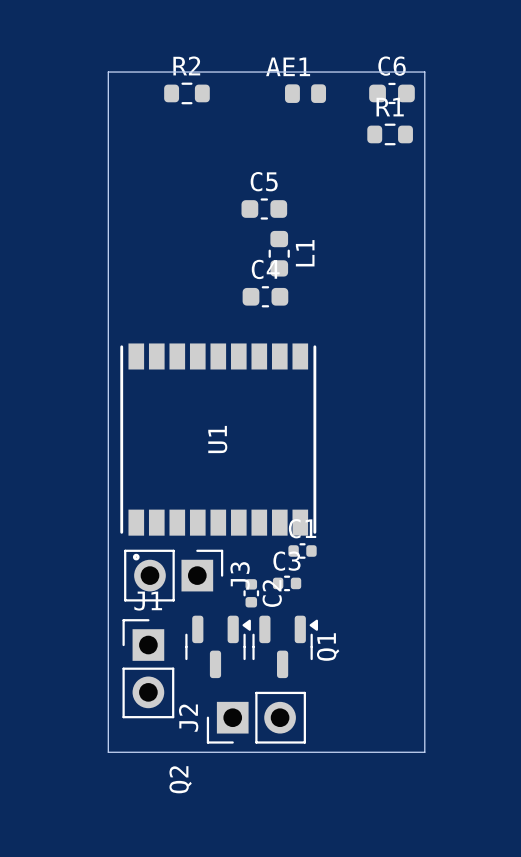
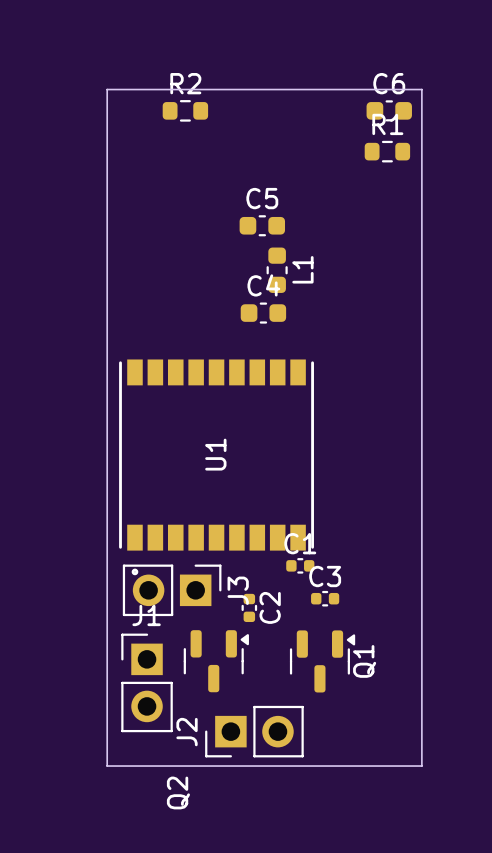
AE1: (305, 93) -> none
C3 position: (287, 583) -> (325, 598)
Q1 position: (285, 646) -> (322, 661)

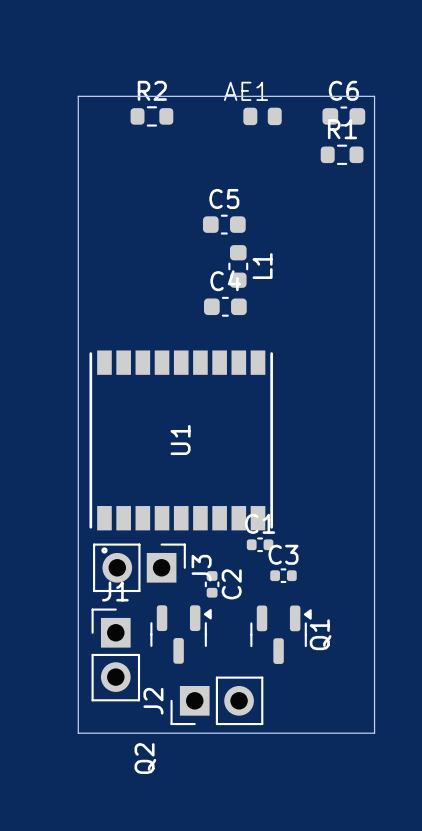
AE1: none -> (262, 116)

